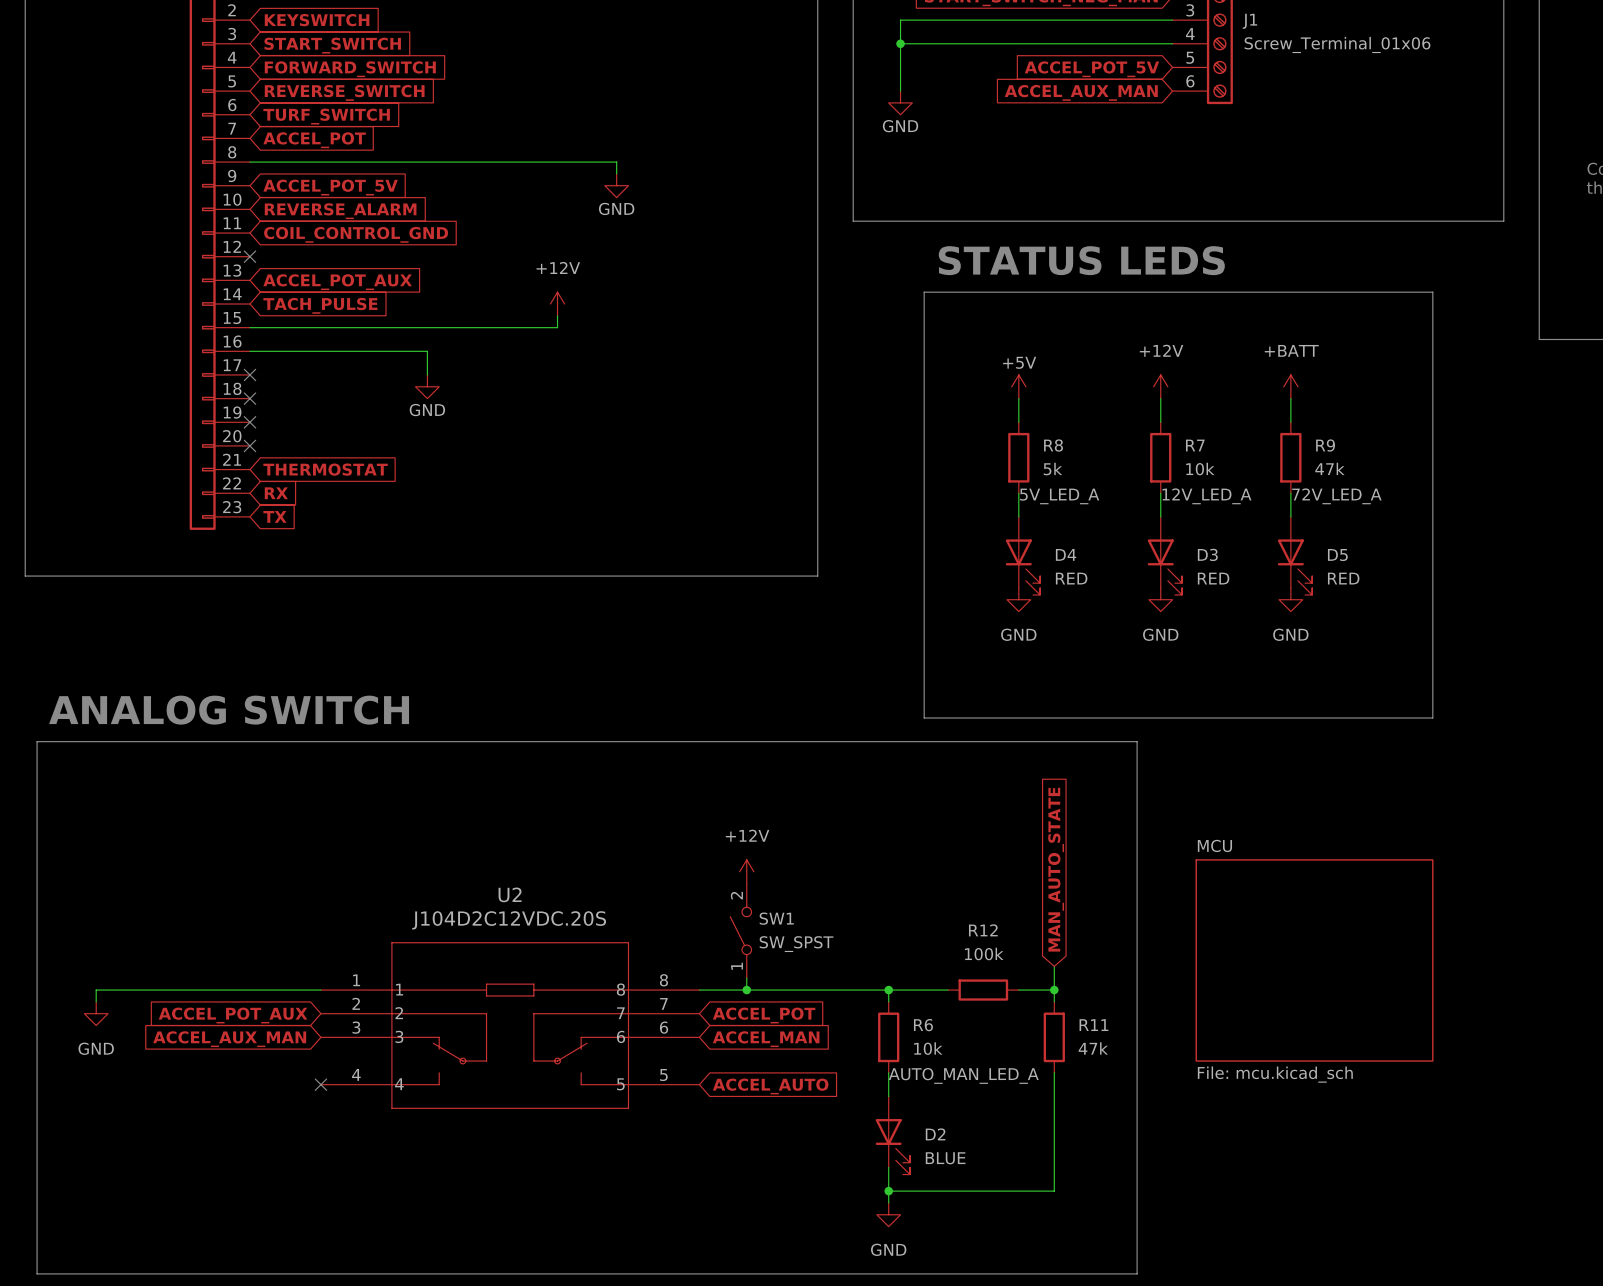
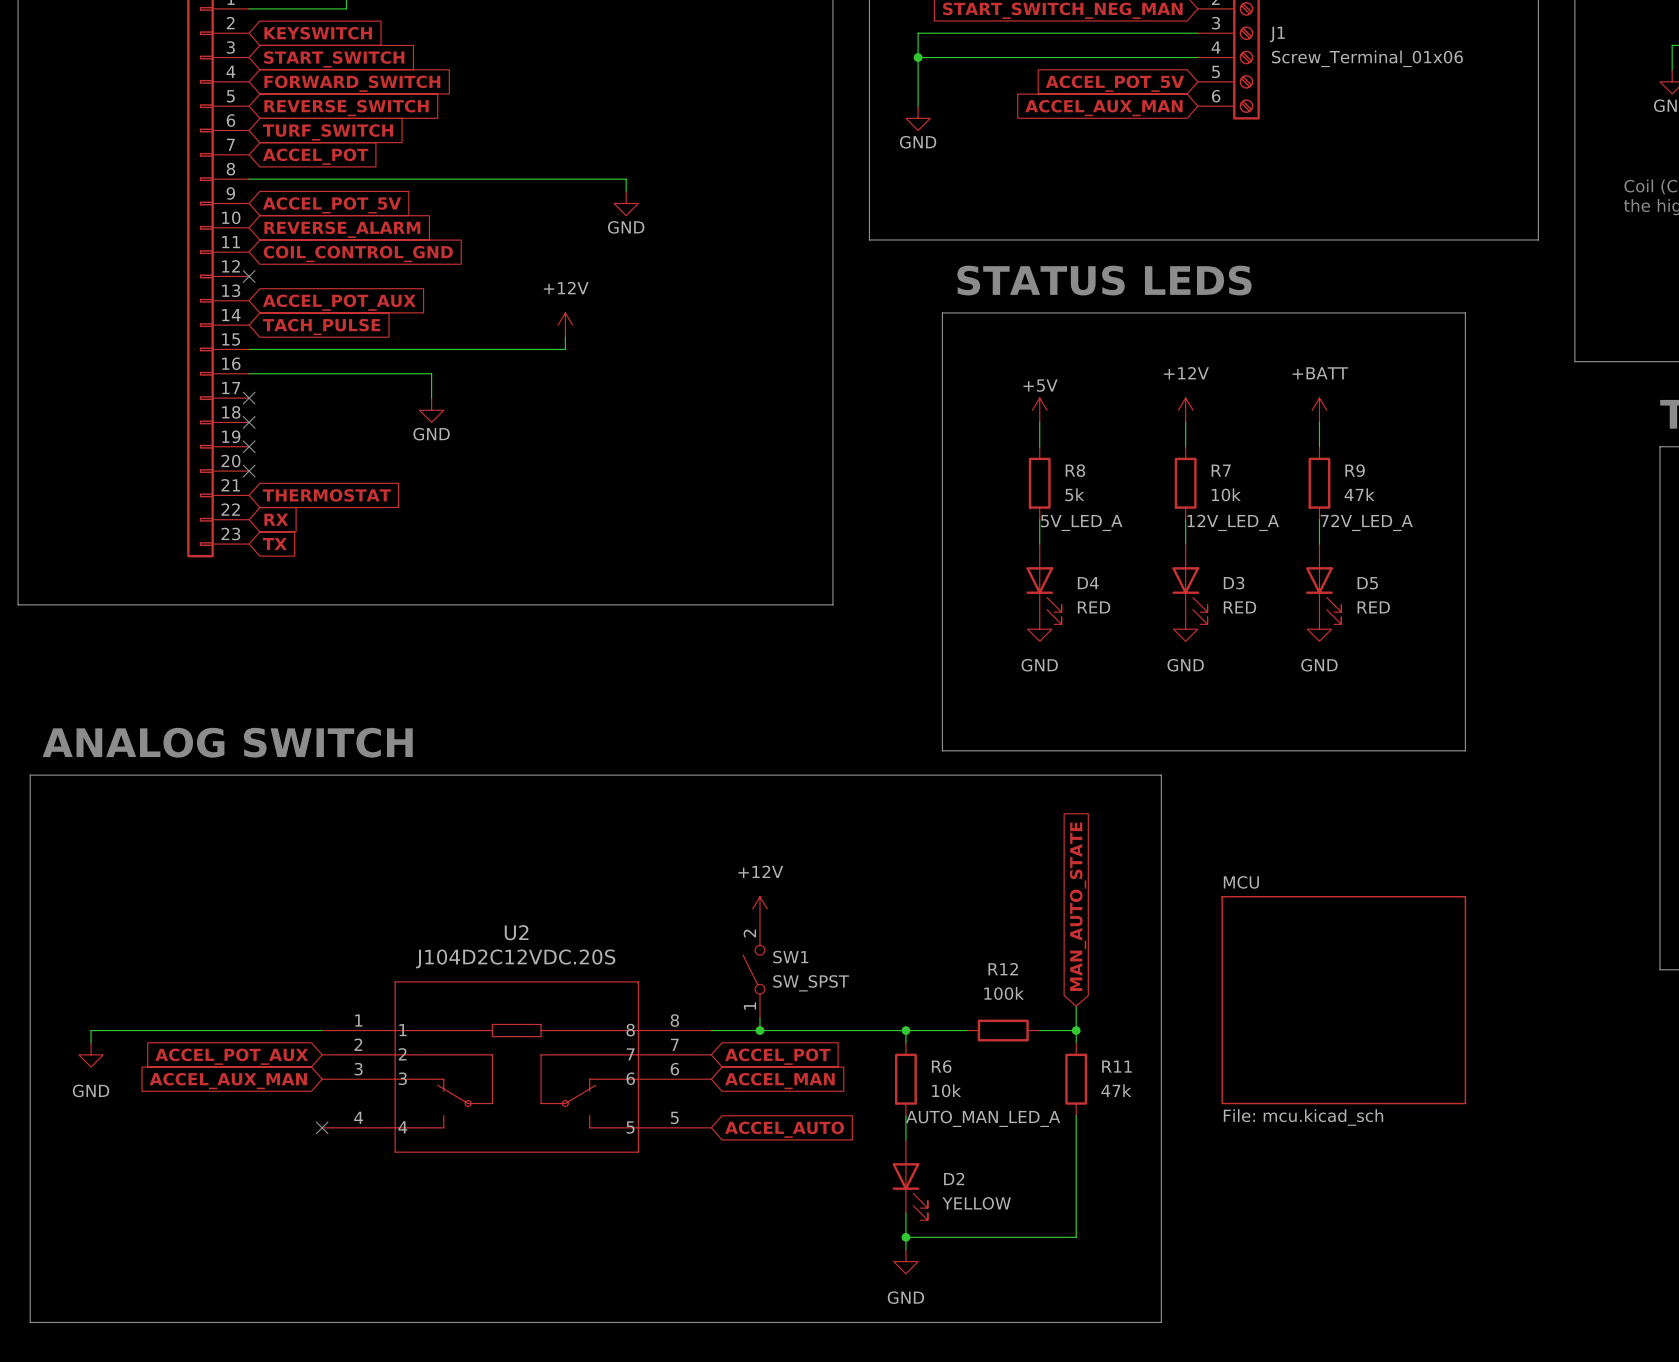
D2 value: BLUE (945, 1158) -> YELLOW (976, 1203)

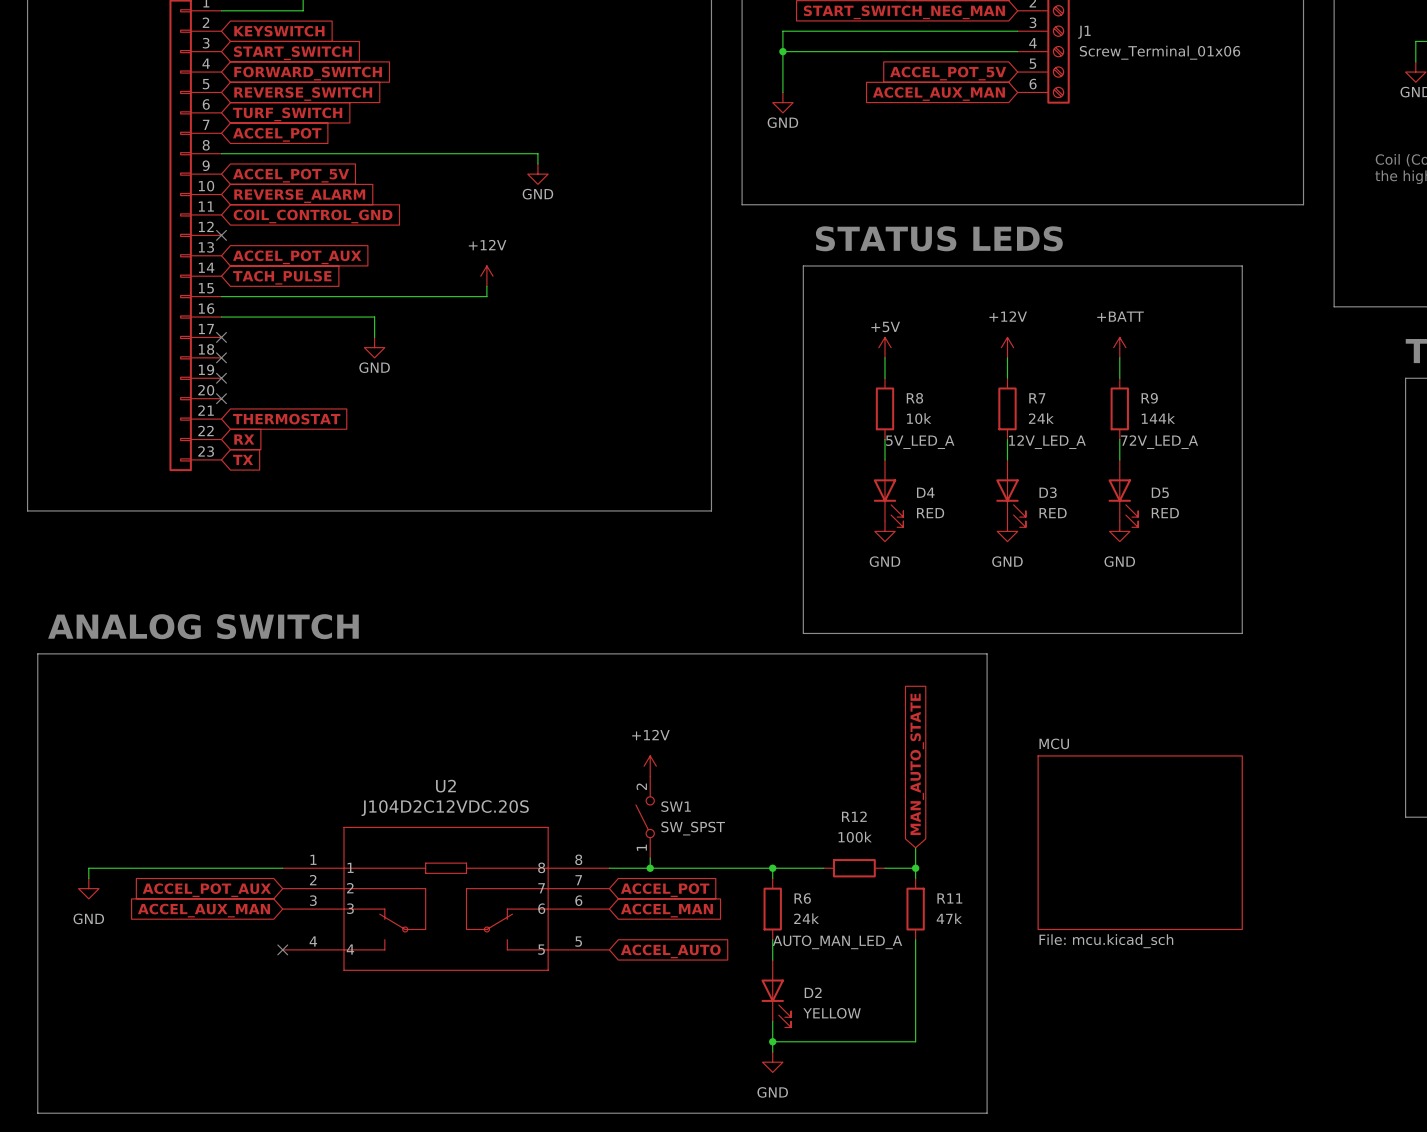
R8 value: 5k (1074, 494) -> 10k (919, 418)
R7 value: 10k (1226, 494) -> 24k (1041, 418)
R9 value: 47k (1359, 494) -> 144k (1158, 418)
R6 value: 10k (946, 1090) -> 24k (806, 918)

